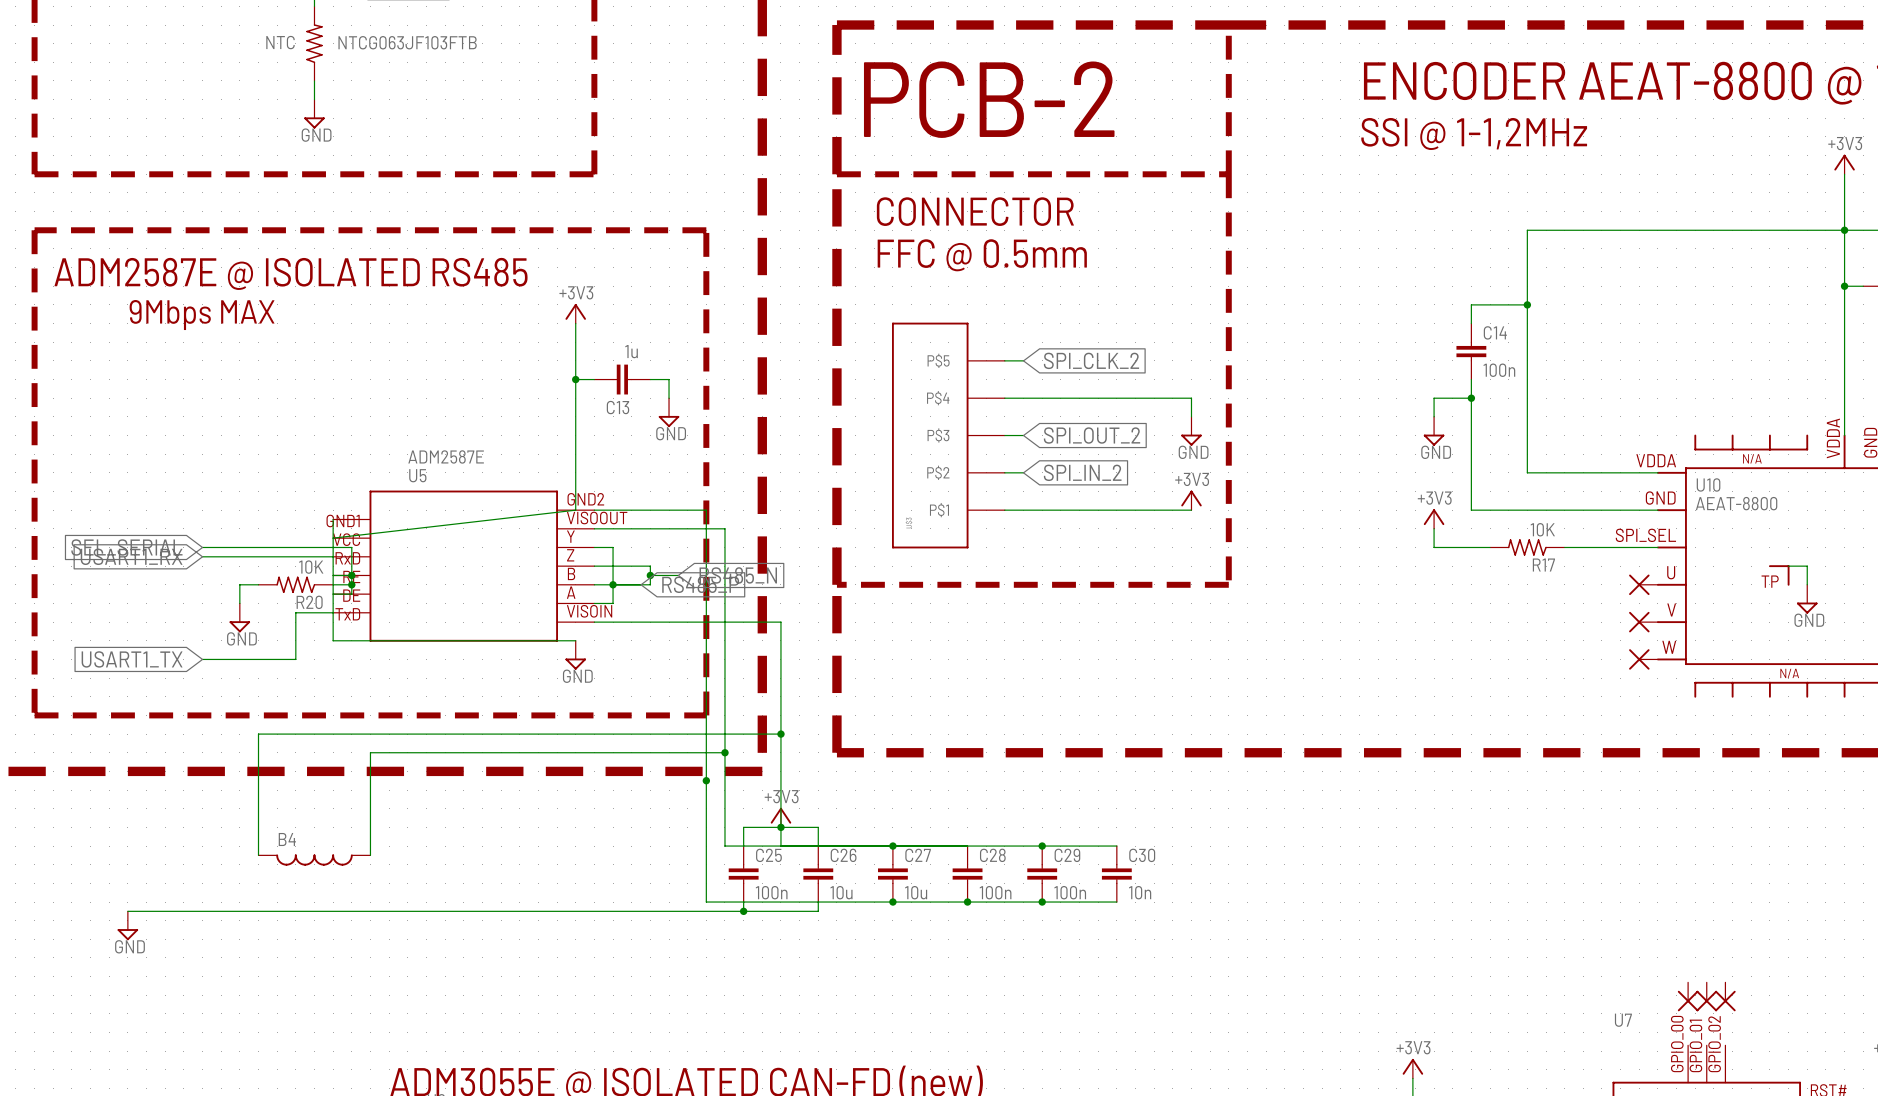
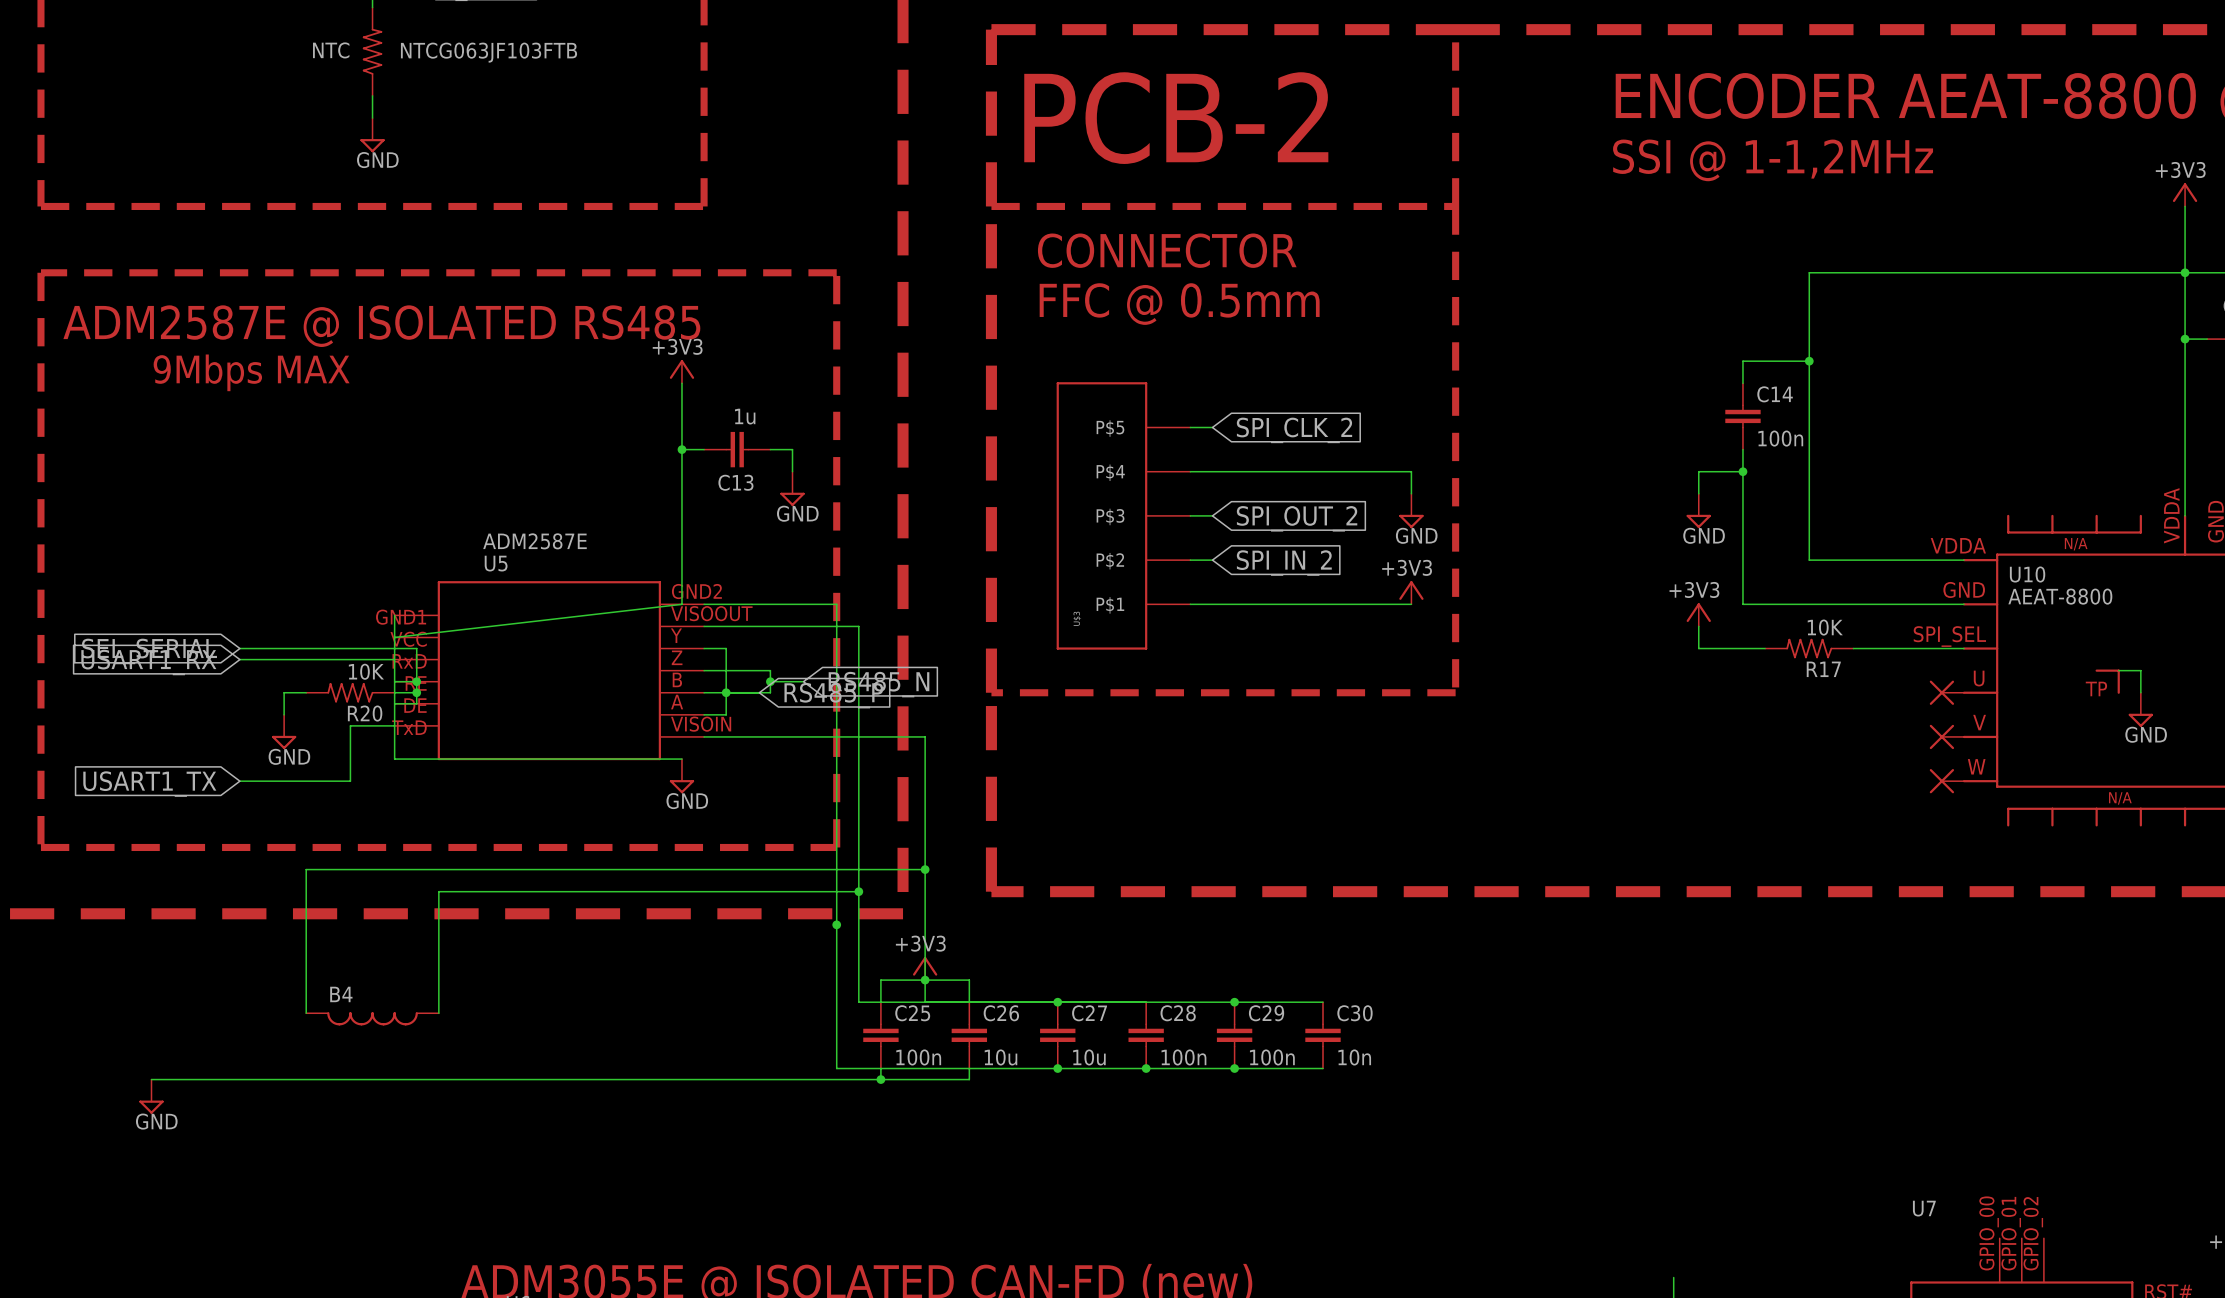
part: (1688, 996) -> none
part: (1706, 996) -> none
part: (1725, 996) -> none
power symbol: +3V3 (1412, 1068) -> none

